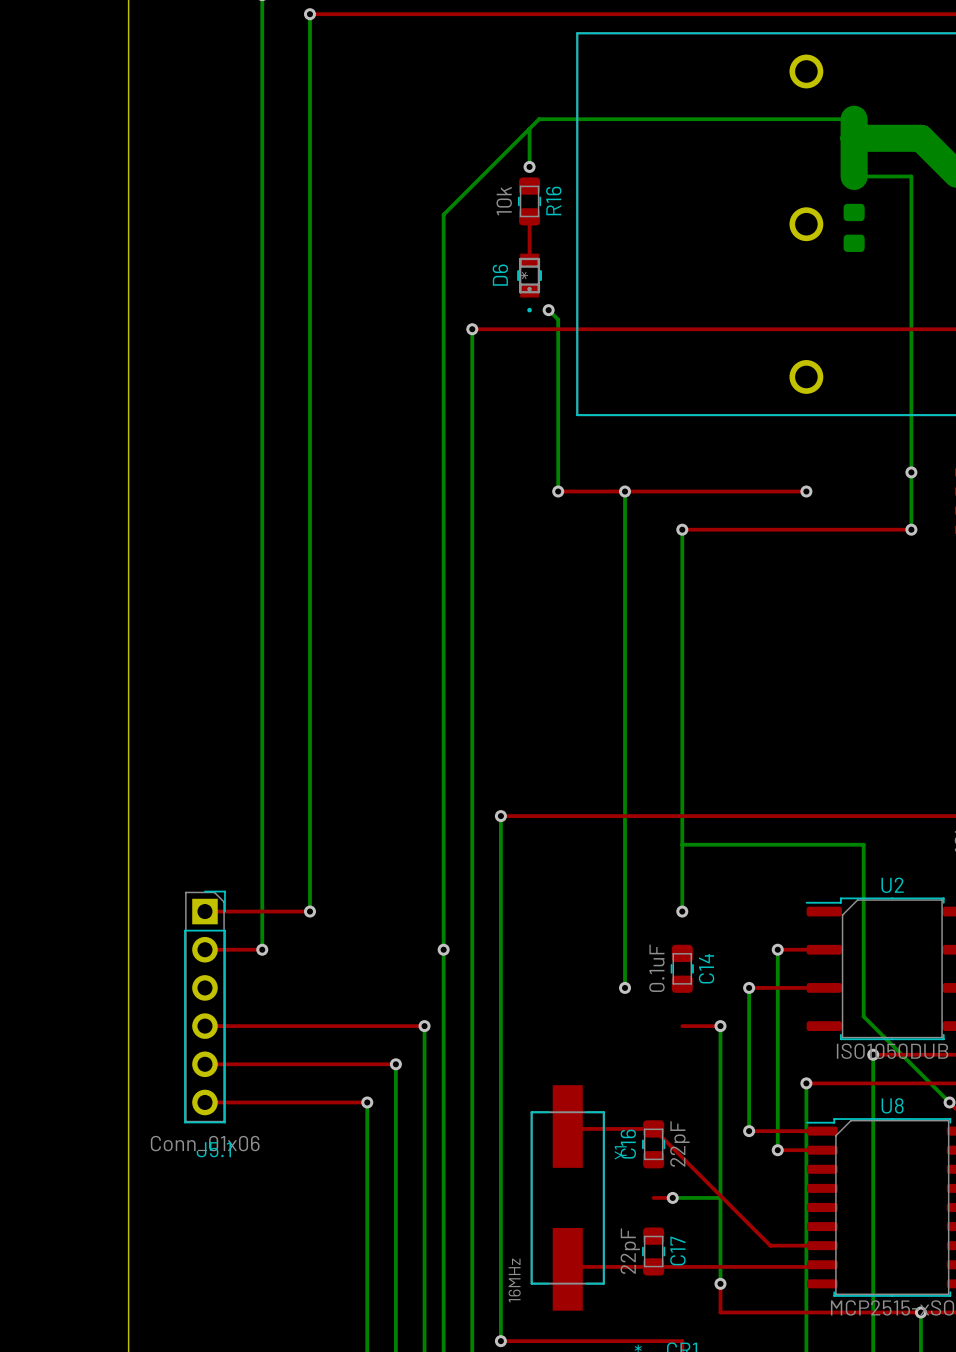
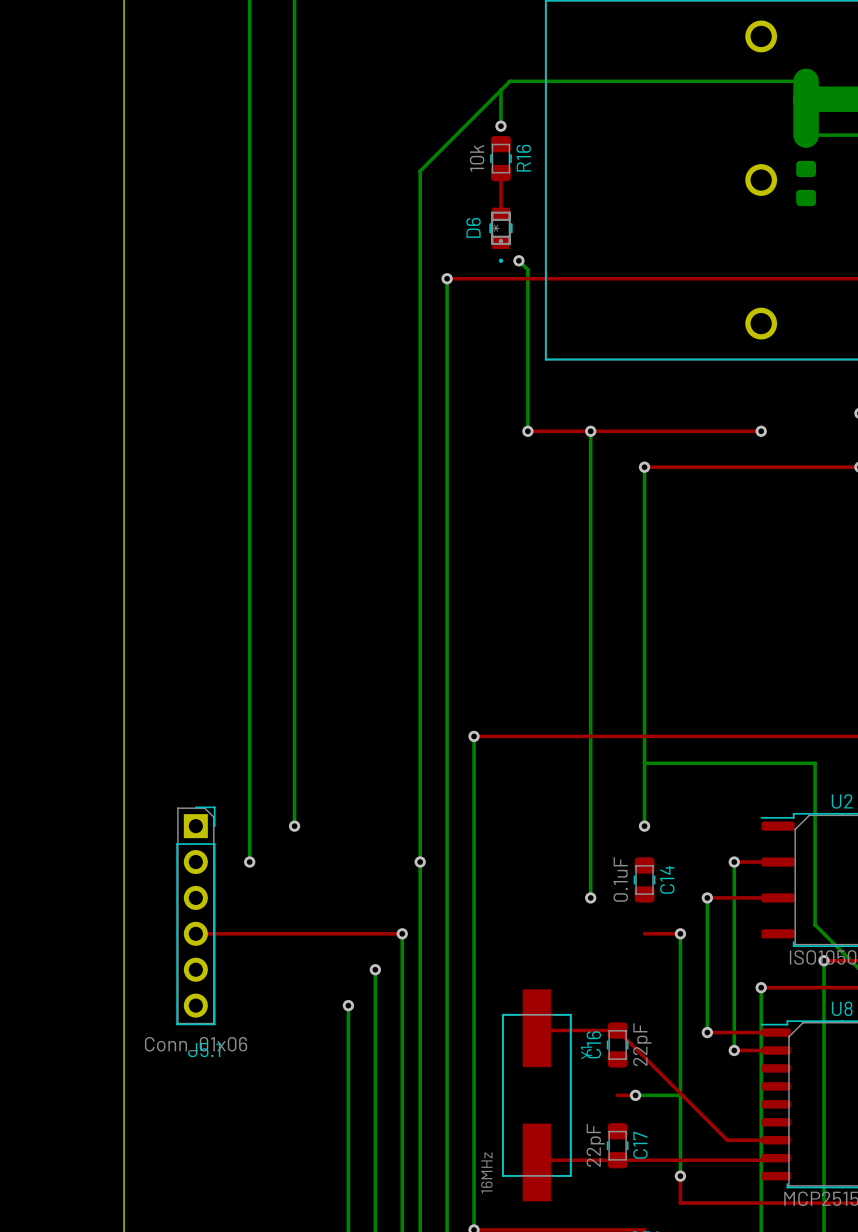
top track: (204, 911) (309, 911) -> none
top track: (204, 949) (262, 949) -> none
top track: (204, 1064) (395, 1064) -> none
top track: (204, 1102) (367, 1102) -> none

